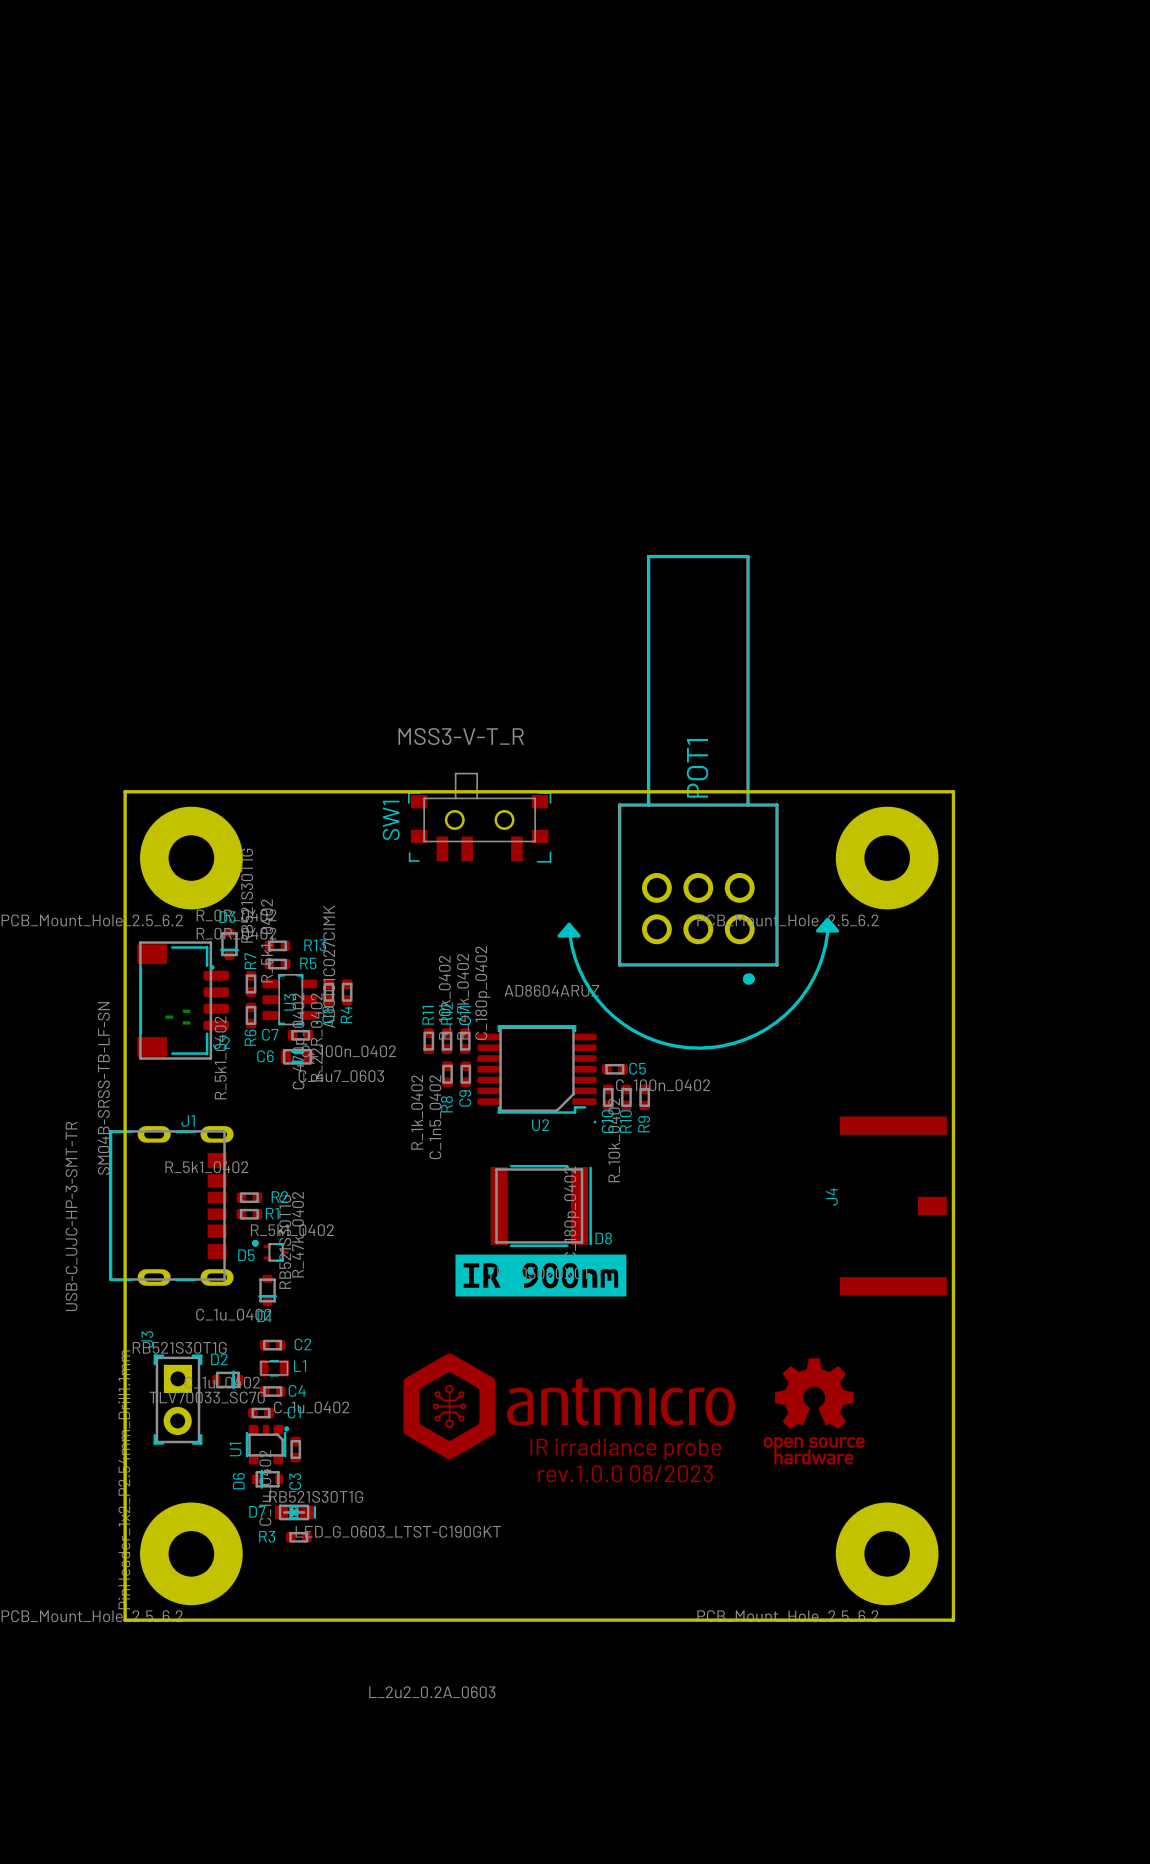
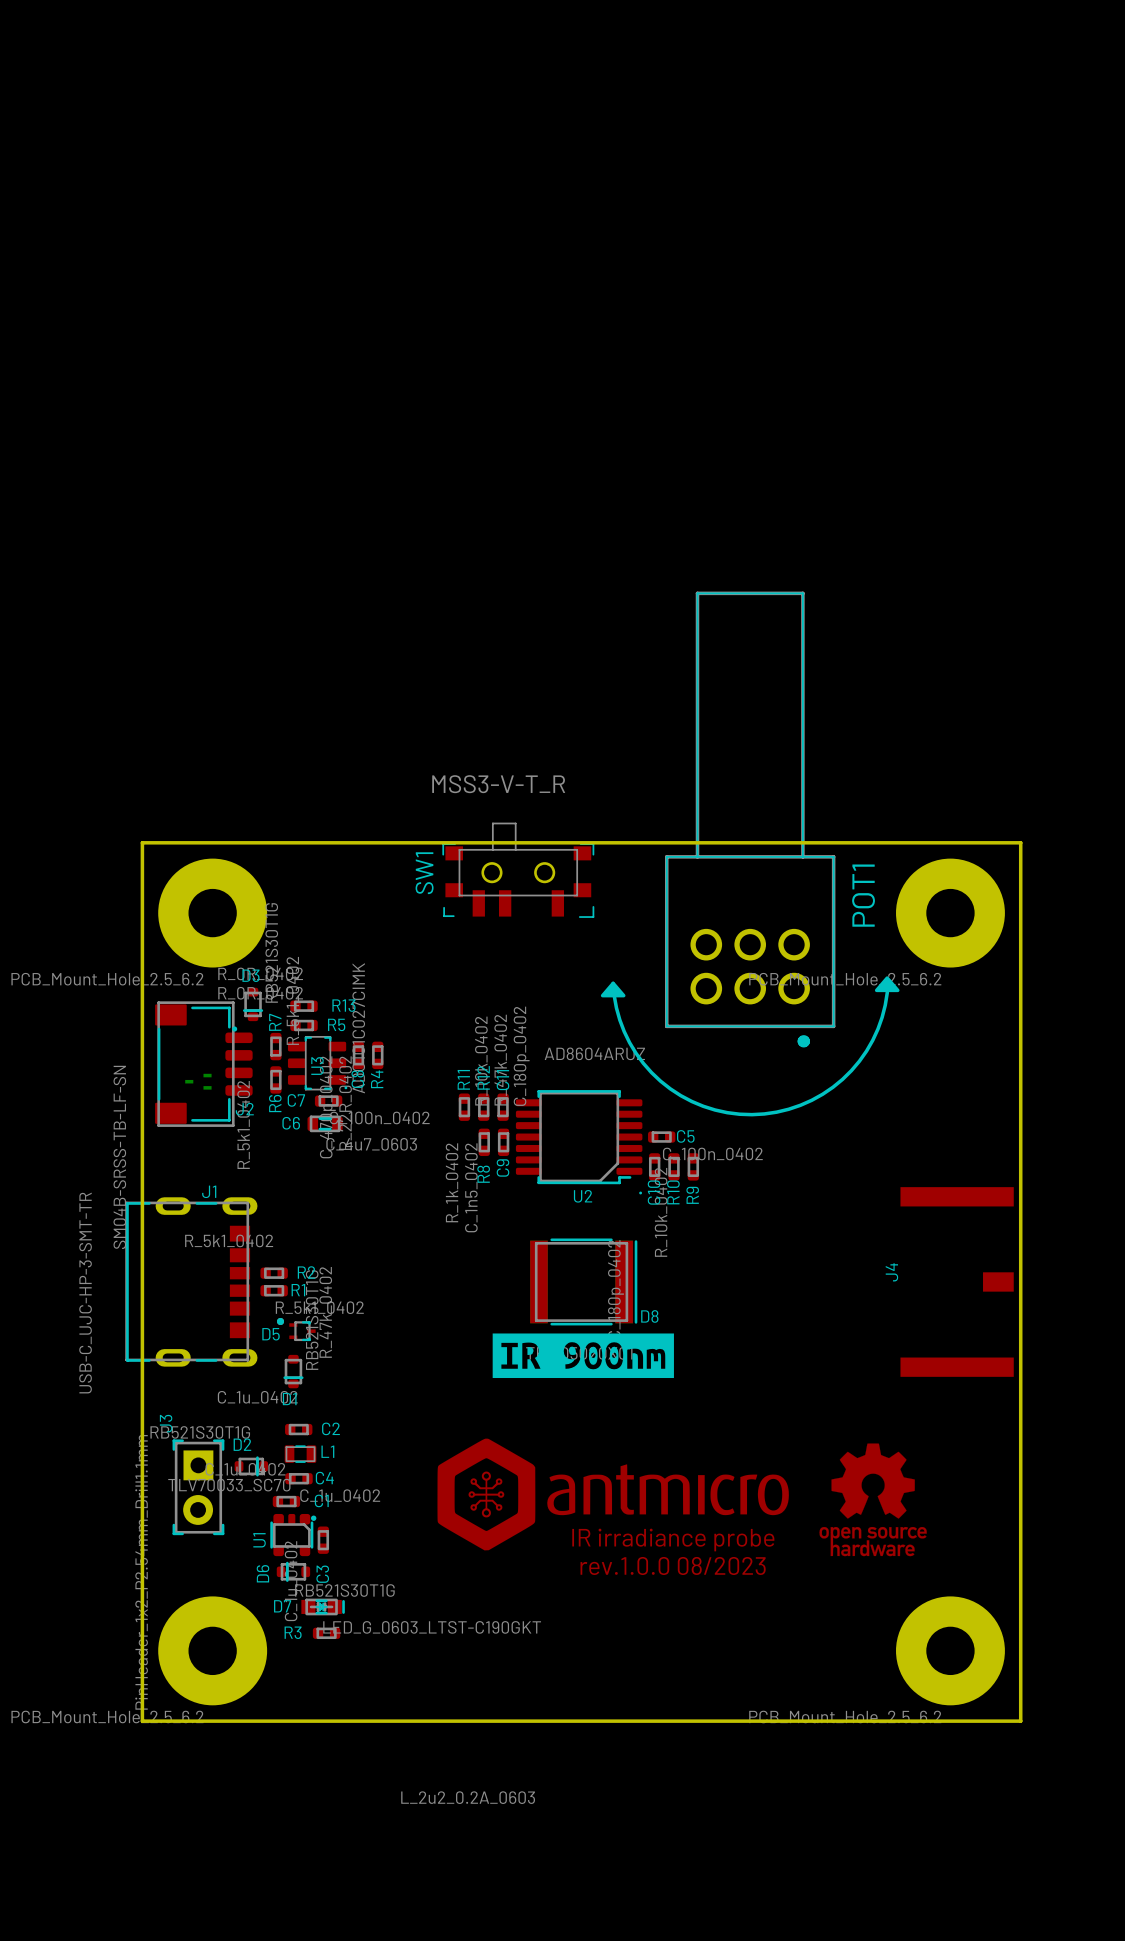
POT1 name position: POT1 (697, 768) -> POT1 (863, 895)

